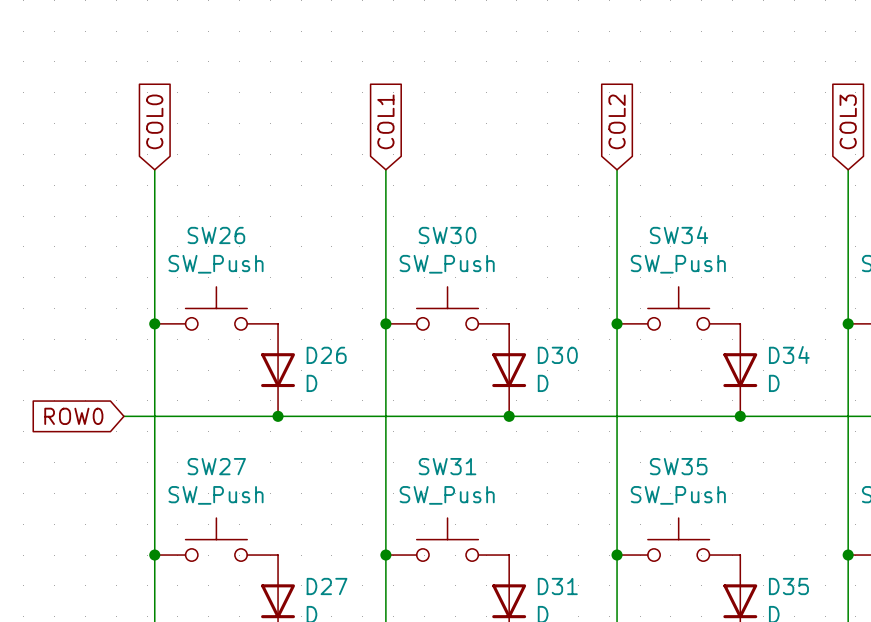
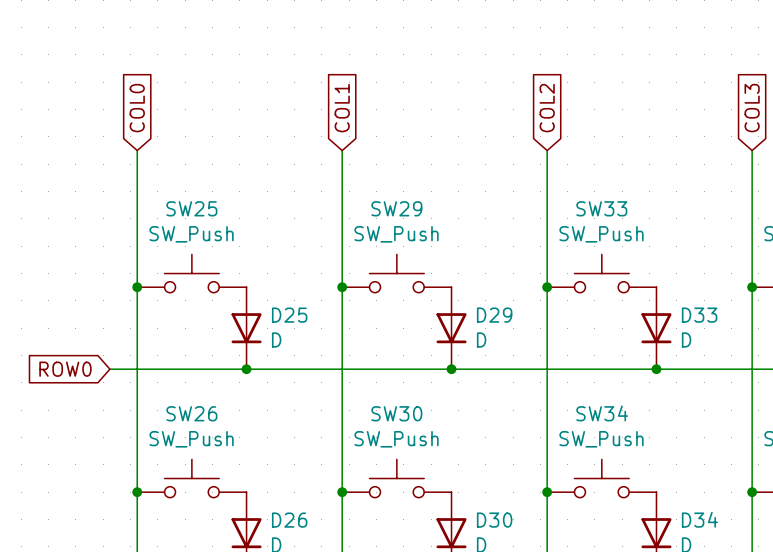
SW26 name: SW26 (216, 235) -> SW25 (191, 208)
SW30 name: SW30 (447, 235) -> SW29 (396, 208)
SW34 name: SW34 (679, 235) -> SW33 (601, 208)
D34 name: D34 (789, 354) -> D33 (699, 315)
D26 name: D26 (326, 355) -> D25 (289, 315)
D30 name: D30 (557, 355) -> D29 (494, 315)
SW27 name: SW27 (216, 466) -> SW26 (191, 413)
SW31 name: SW31 (447, 466) -> SW30 (396, 413)
SW35 name: SW35 (678, 466) -> SW34 (602, 413)
D27 name: D27 (327, 586) -> D26 (289, 520)
D31 name: D31 (557, 586) -> D30 (494, 520)
D35 name: D35 (788, 586) -> D34 (699, 519)

